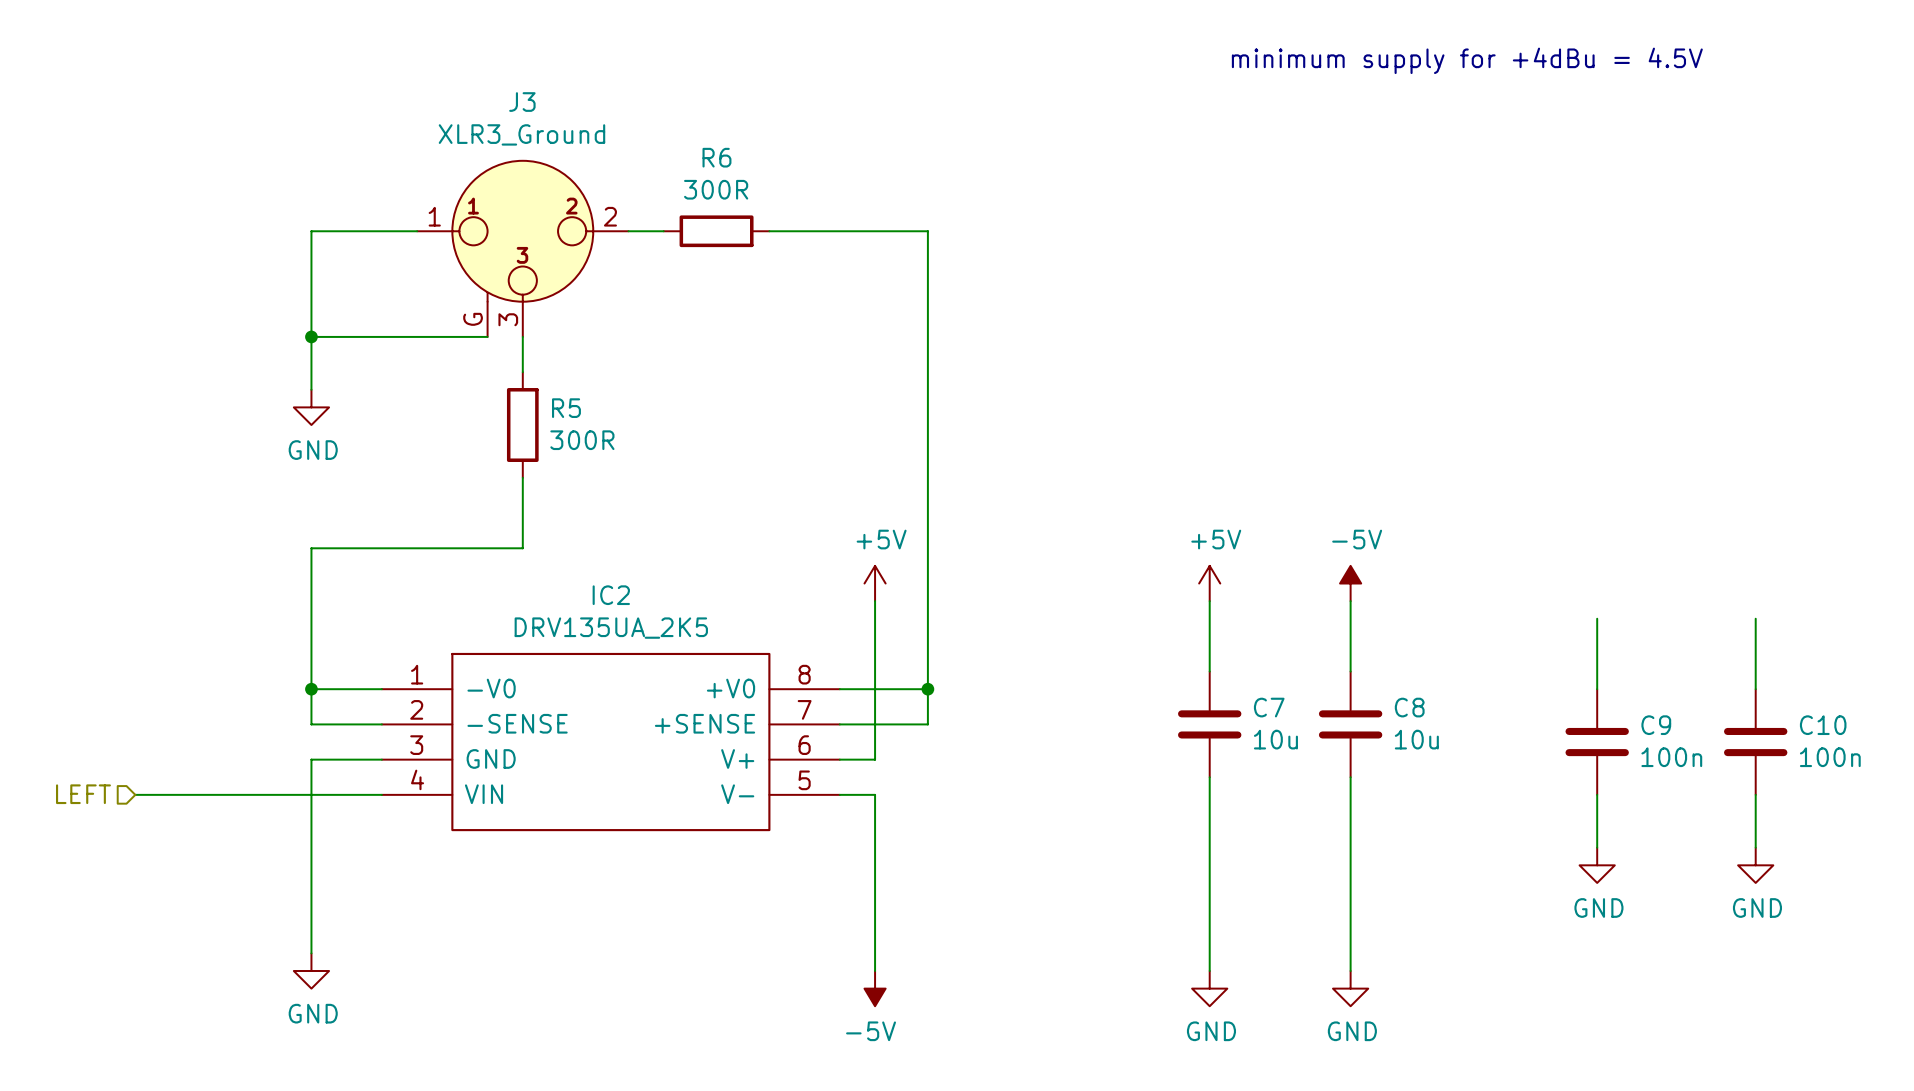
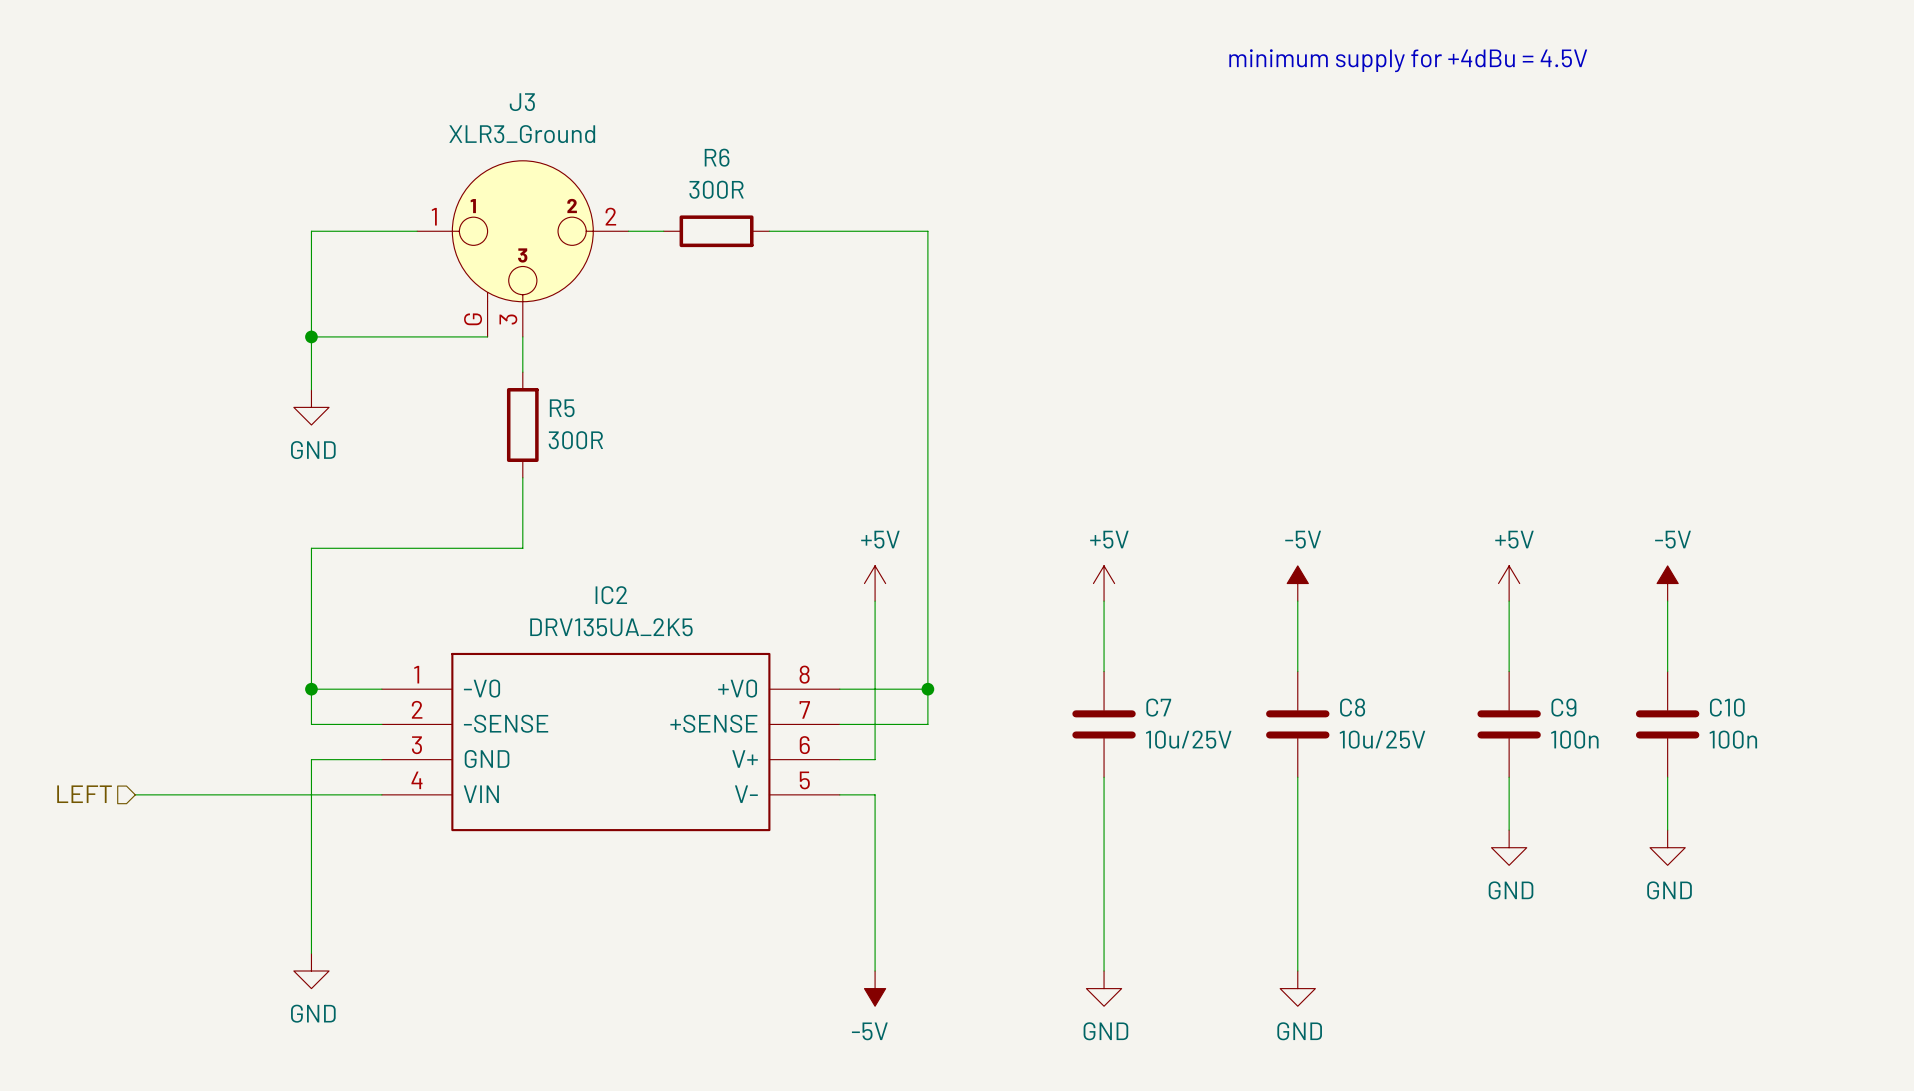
power symbol position: +5V (1209, 583) -> +5V (1104, 583)
power symbol position: -5V (1350, 583) -> -5V (1297, 583)
power symbol: none -> +5V (1509, 583)
power symbol: none -> -5V (1667, 583)
wire: (1209, 601) (1209, 671) -> (1104, 601) (1104, 671)
wire: (1350, 601) (1350, 671) -> (1297, 601) (1297, 671)
wire: (1597, 618) (1597, 689) -> (1509, 601) (1509, 671)
wire: (1755, 618) (1755, 689) -> (1667, 601) (1667, 671)
C7 position: (1209, 724) -> (1104, 724)
C8 position: (1350, 724) -> (1297, 724)
C7 value: 10u (1275, 739) -> 10u/25V (1188, 739)
C8 value: 10u (1416, 739) -> 10u/25V (1382, 739)
C9 position: (1597, 742) -> (1509, 724)
C10 position: (1755, 742) -> (1667, 724)
wire: (1209, 777) (1209, 971) -> (1104, 777) (1104, 971)
wire: (1350, 777) (1350, 971) -> (1297, 777) (1297, 971)
wire: (1597, 794) (1597, 847) -> (1509, 777) (1509, 830)
wire: (1755, 794) (1755, 847) -> (1667, 777) (1667, 830)
power symbol: none -> GND (1509, 847)
power symbol: none -> GND (1667, 847)
power symbol: GND (1597, 865) -> none
power symbol: GND (1755, 865) -> none
power symbol: none -> GND (1104, 988)
power symbol: GND (1209, 988) -> none
power symbol: none -> GND (1297, 988)
power symbol: GND (1350, 988) -> none

